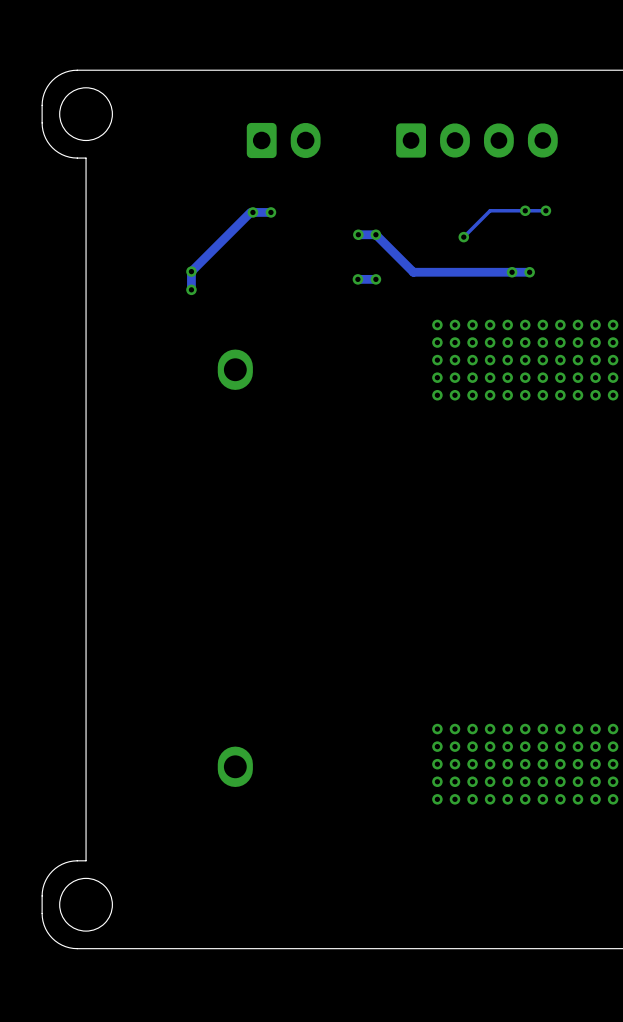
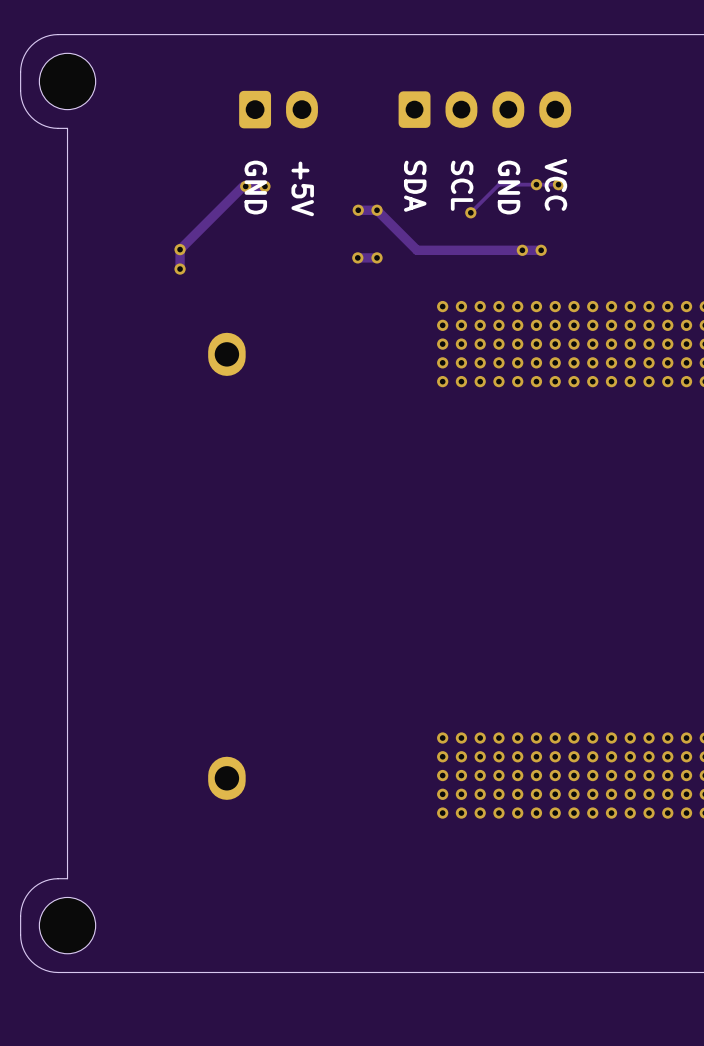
text: none -> VCC (555, 184)
text: none -> SCL (462, 185)
text: none -> SDA (415, 186)
text: none -> GND (255, 187)
text: none -> GND (509, 187)
text: none -> +5V (302, 188)

